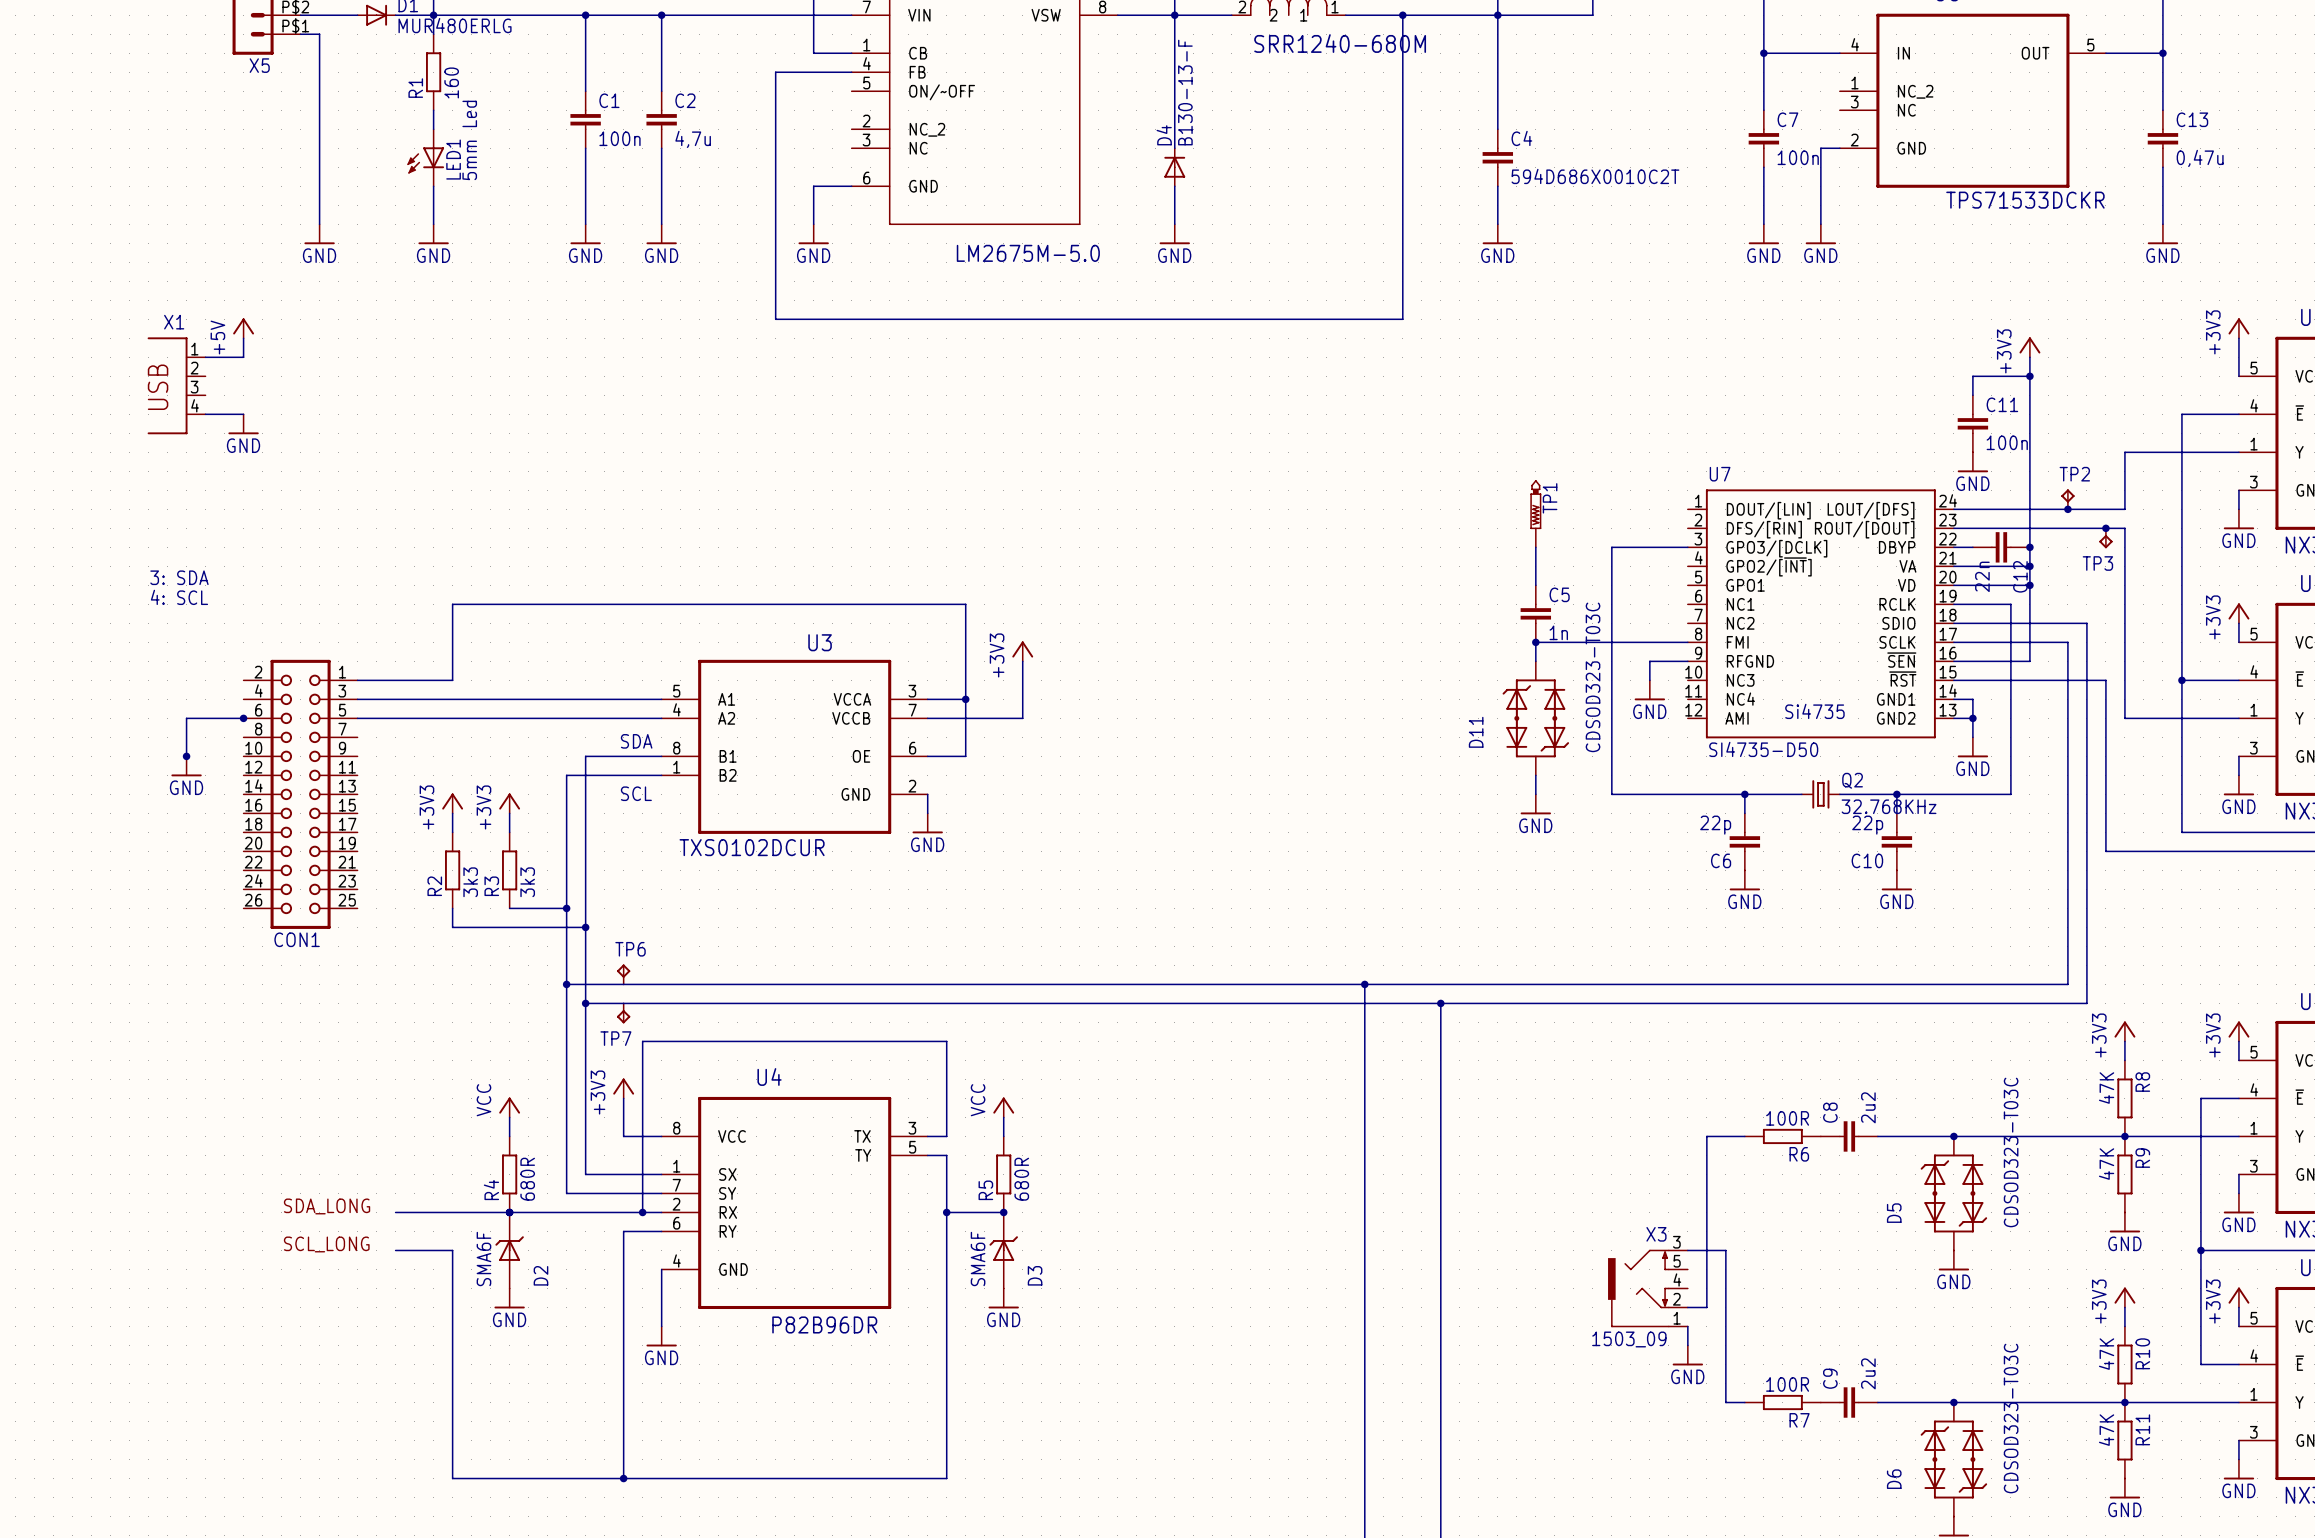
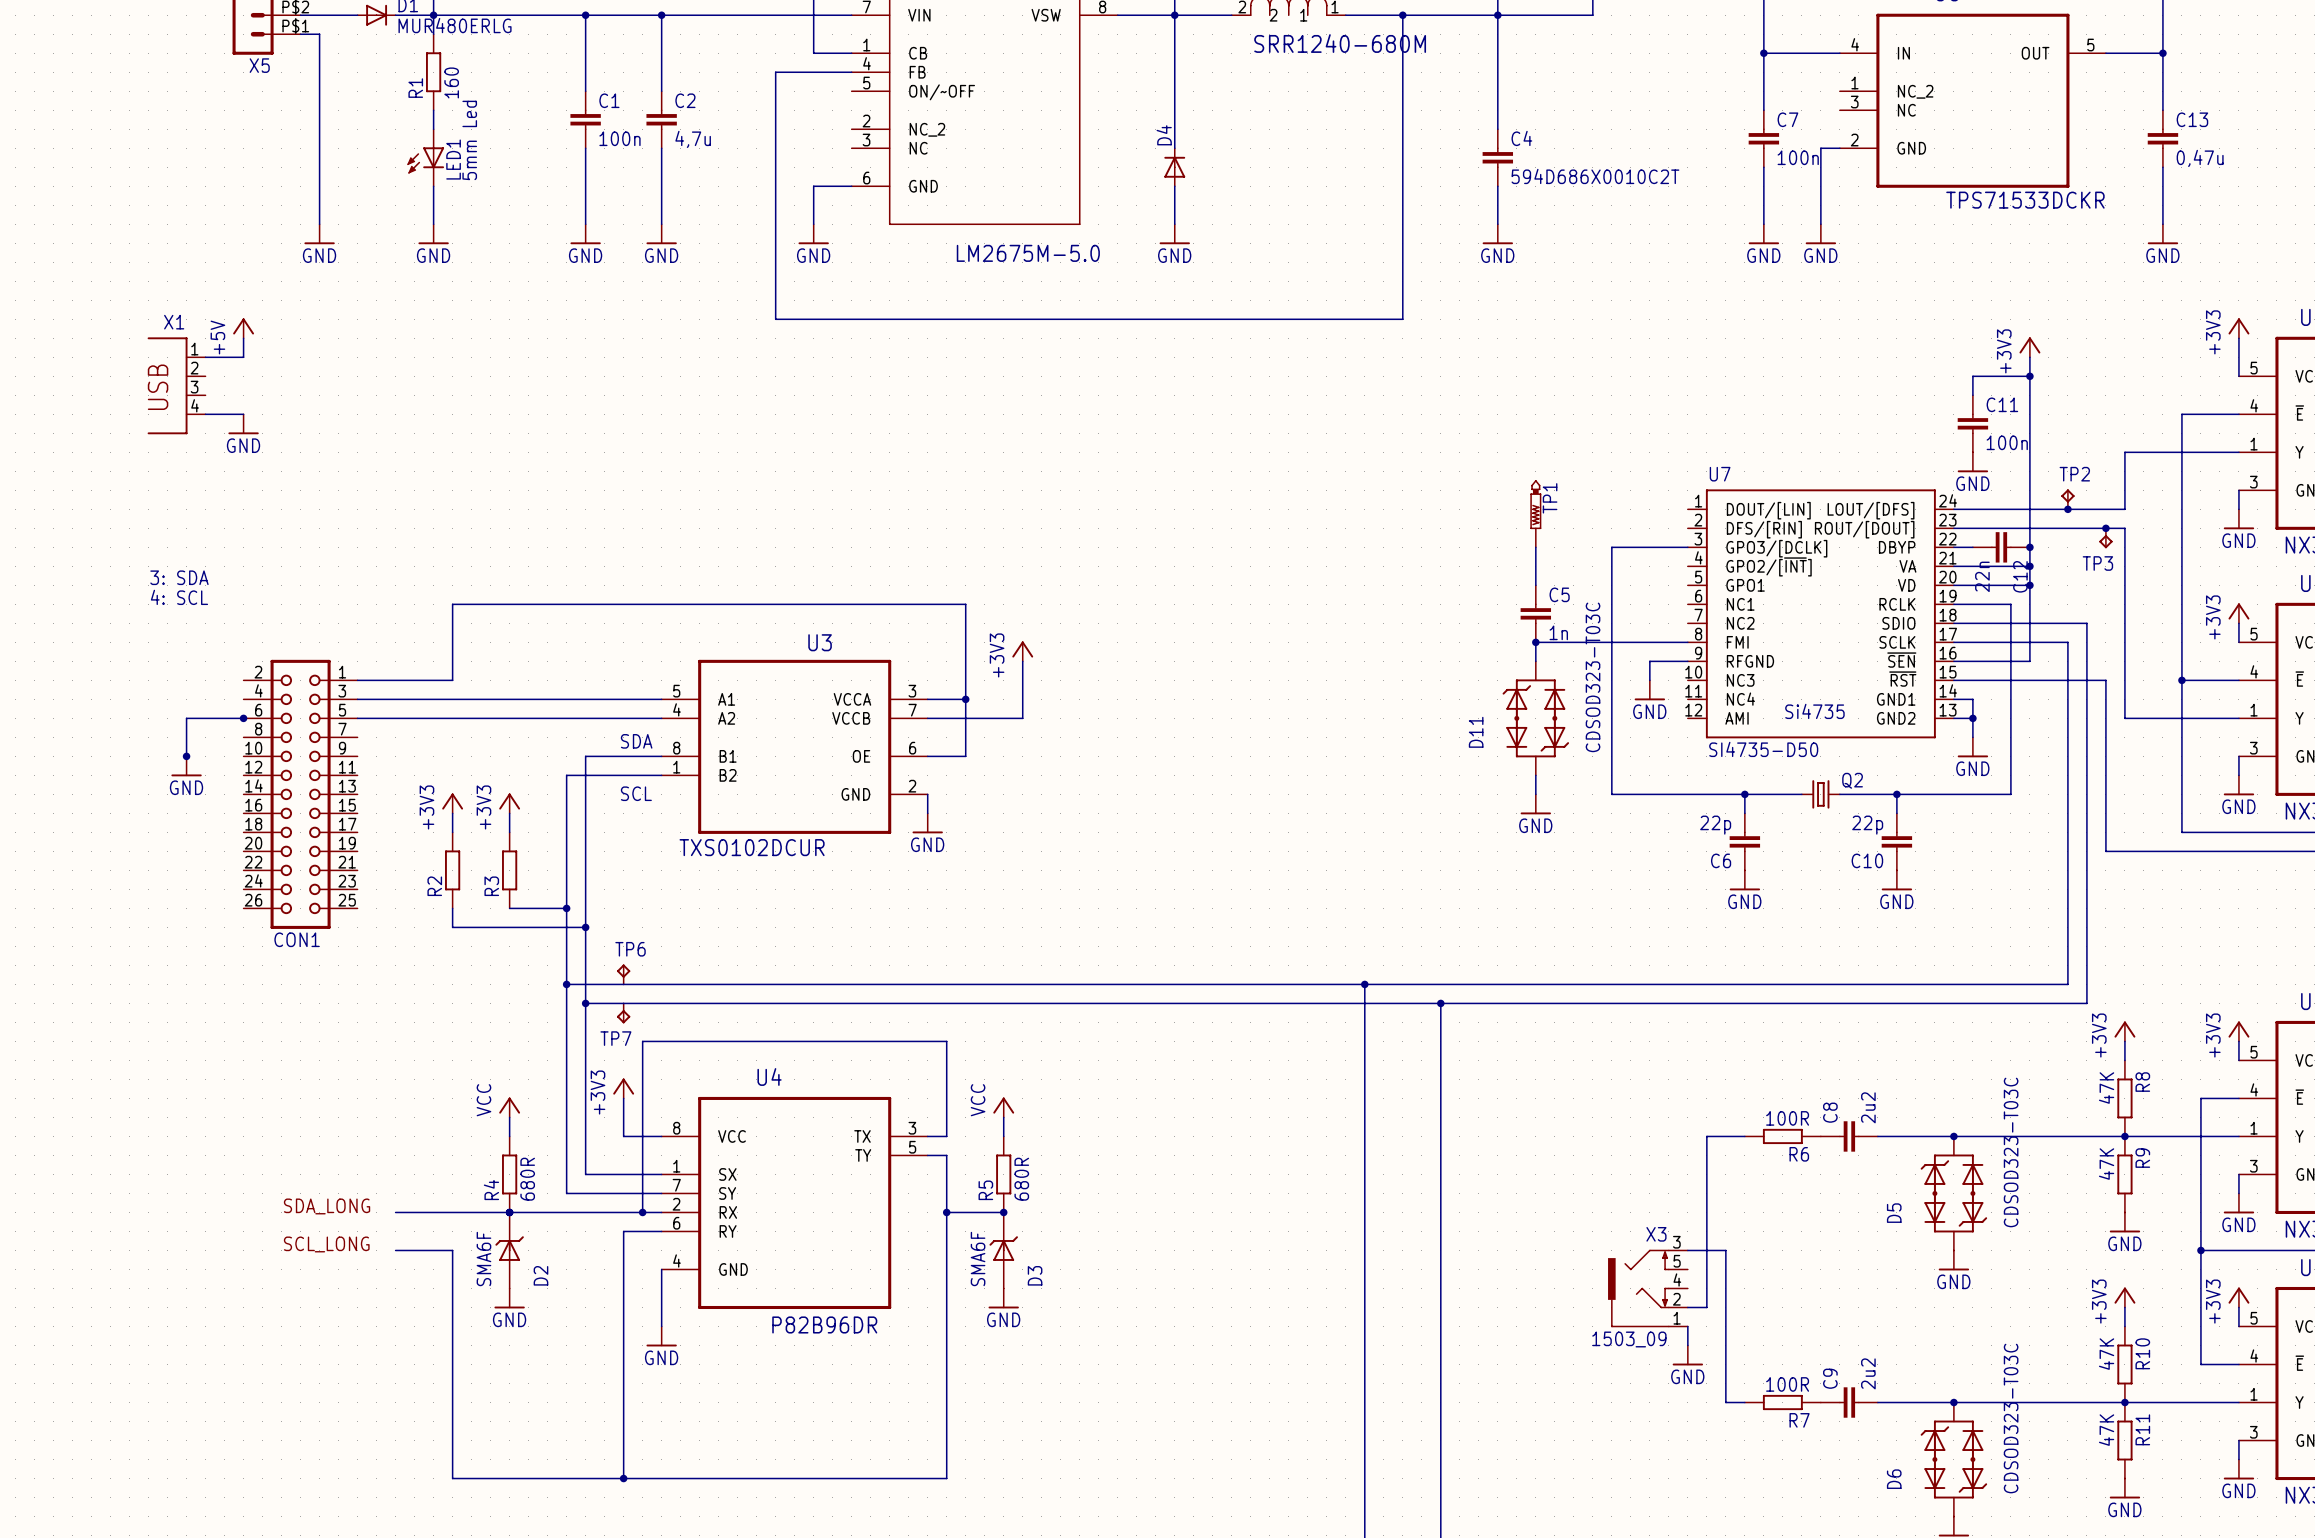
D4 value: B130-13-F (1185, 92) -> none
Q2 value: 32.768KHz (1889, 806) -> none
R2 value: 3k3 (470, 882) -> none
R3 value: 3k3 (527, 882) -> none

